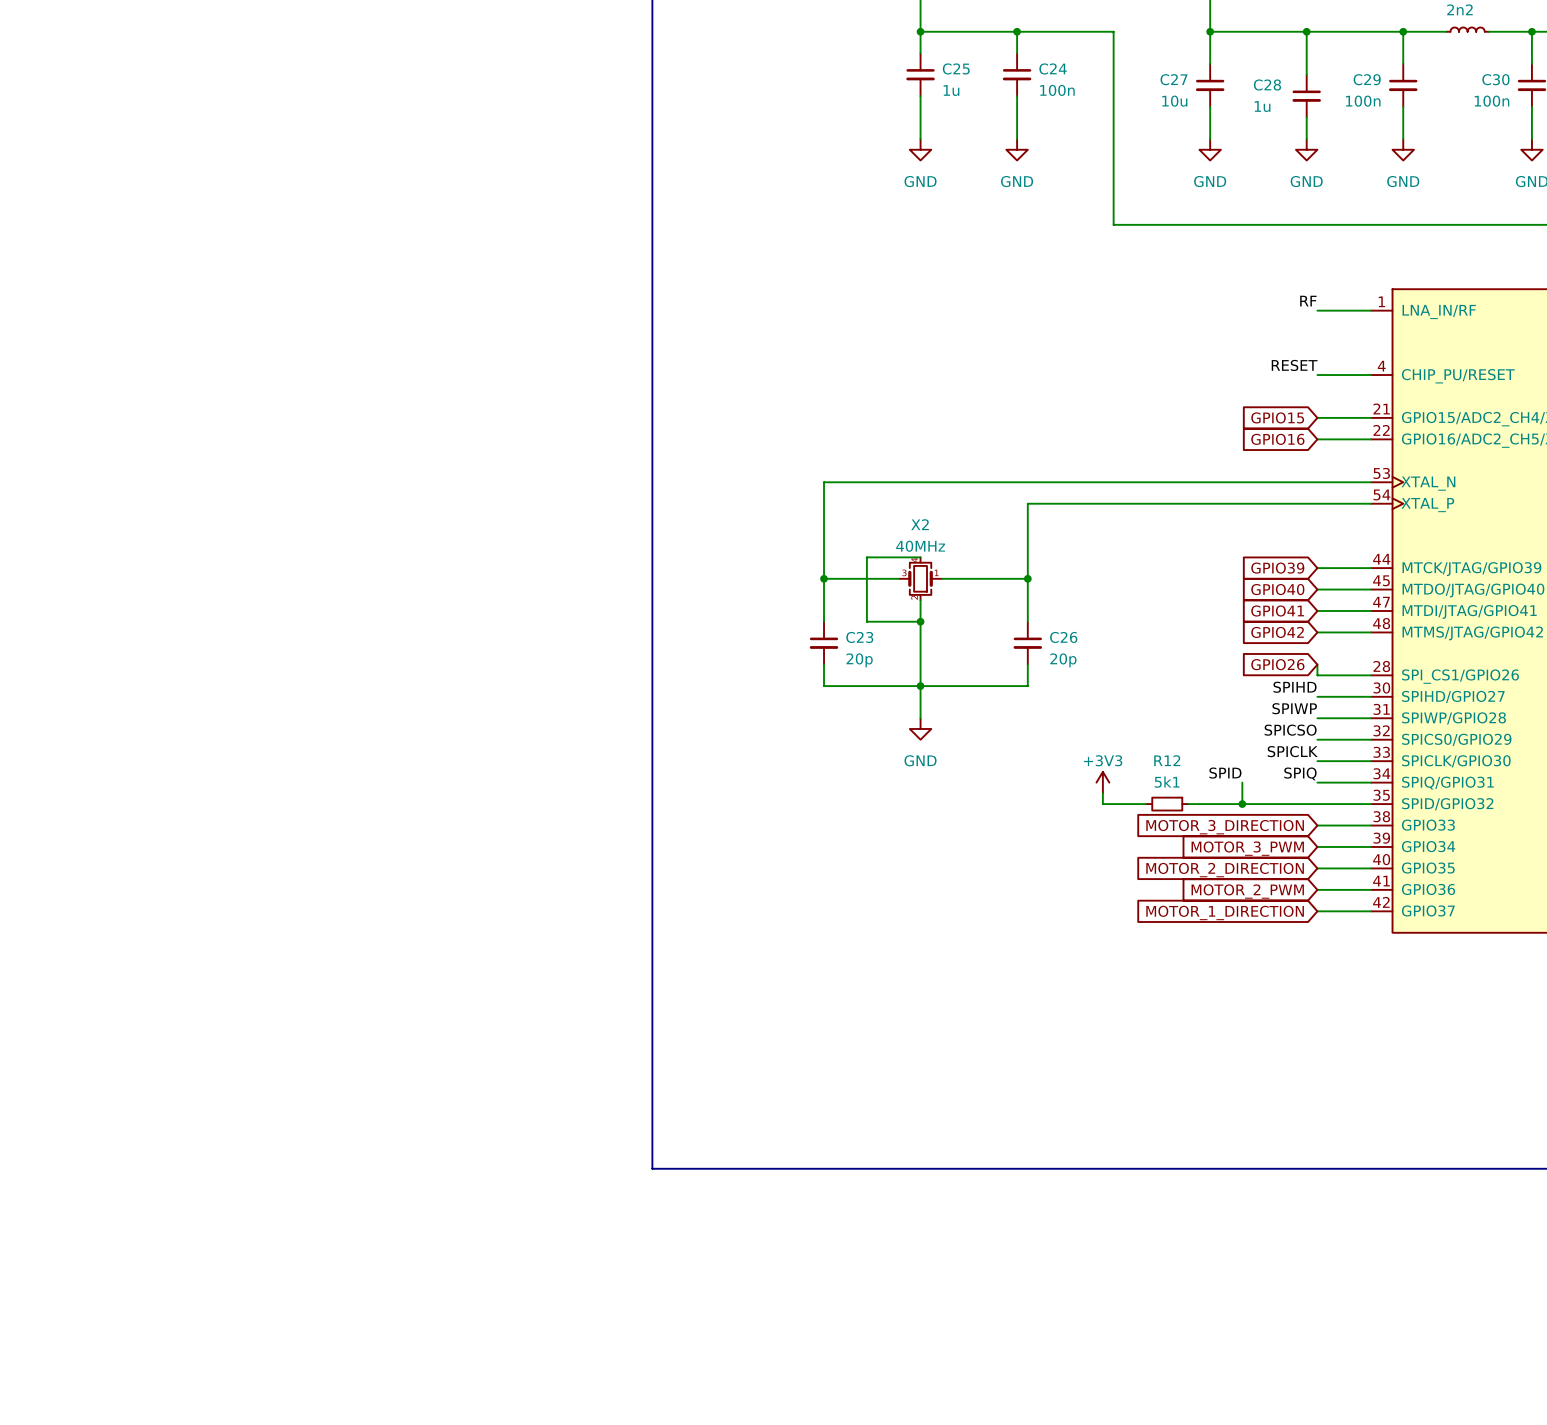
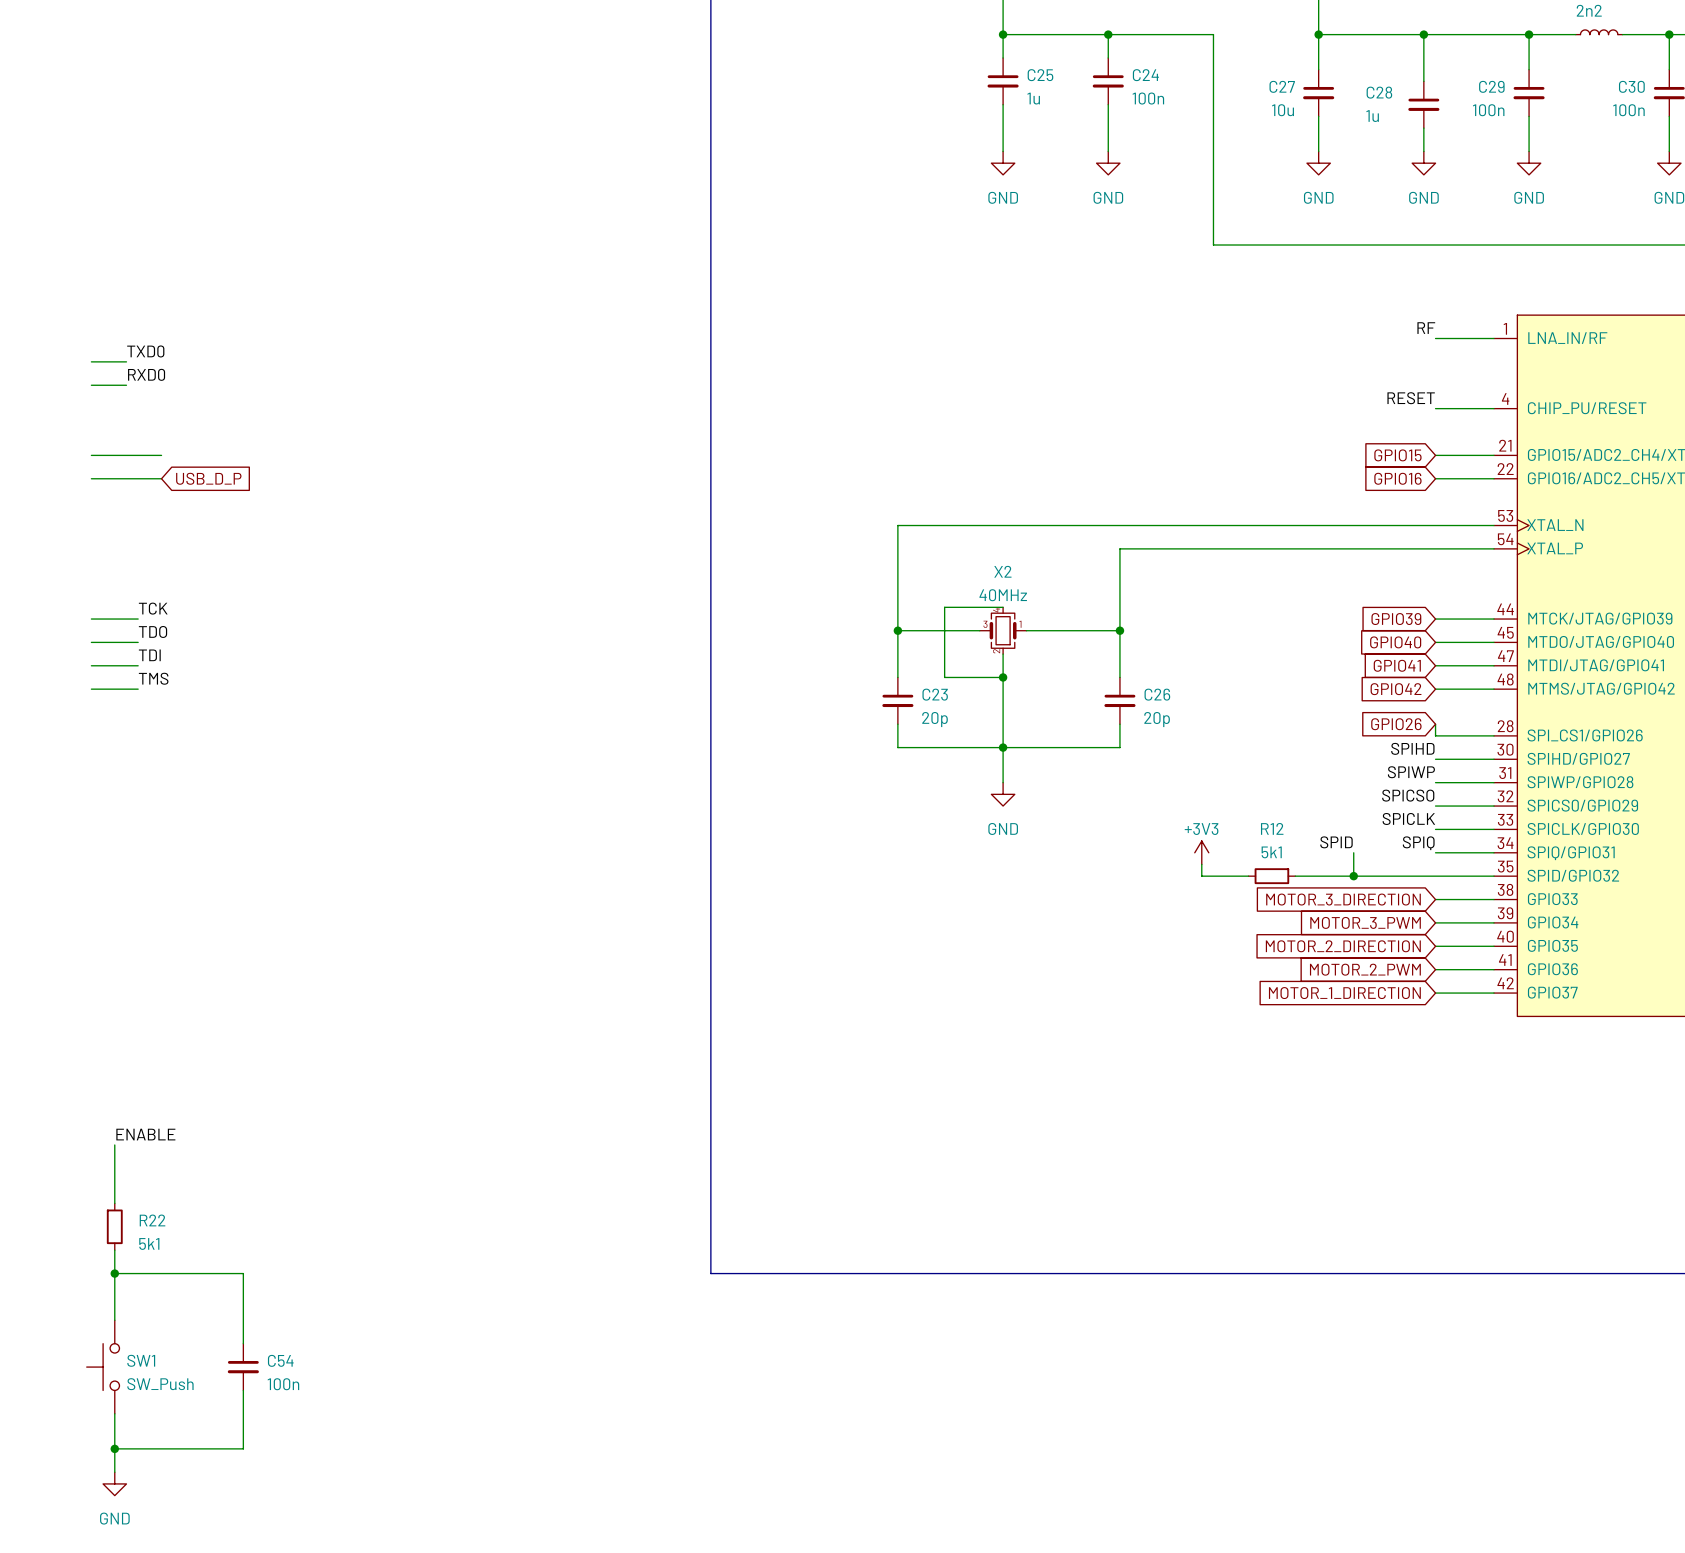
label: none -> TXD0 (145, 351)
wire: none -> (91, 361) (126, 361)
label: none -> RXD0 (146, 374)
wire: none -> (91, 385) (126, 385)
wire: none -> (91, 455) (161, 455)
wire: none -> (91, 478) (161, 478)
global label: none -> USB_D_P (208, 478)
label: none -> TCK (153, 608)
wire: none -> (91, 619) (138, 619)
label: none -> TDO (153, 631)
wire: none -> (91, 642) (138, 642)
label: none -> TDI (149, 655)
wire: none -> (91, 665) (138, 665)
label: none -> TMS (153, 678)
wire: none -> (91, 689) (138, 689)
label: none -> ENABLE (145, 1134)
wire: none -> (114, 1144) (114, 1203)
R22: none -> 5k1 (114, 1226)
wire: none -> (114, 1250) (114, 1320)
wire: none -> (114, 1273) (243, 1273) (243, 1343)
junction: none -> (114, 1273)
SW1: none -> SW_Push (103, 1367)
C54: none -> 100n (243, 1367)
wire: none -> (243, 1390) (243, 1448) (114, 1448)
wire: none -> (114, 1413) (114, 1472)
junction: none -> (114, 1448)
power symbol: none -> GND (114, 1483)

